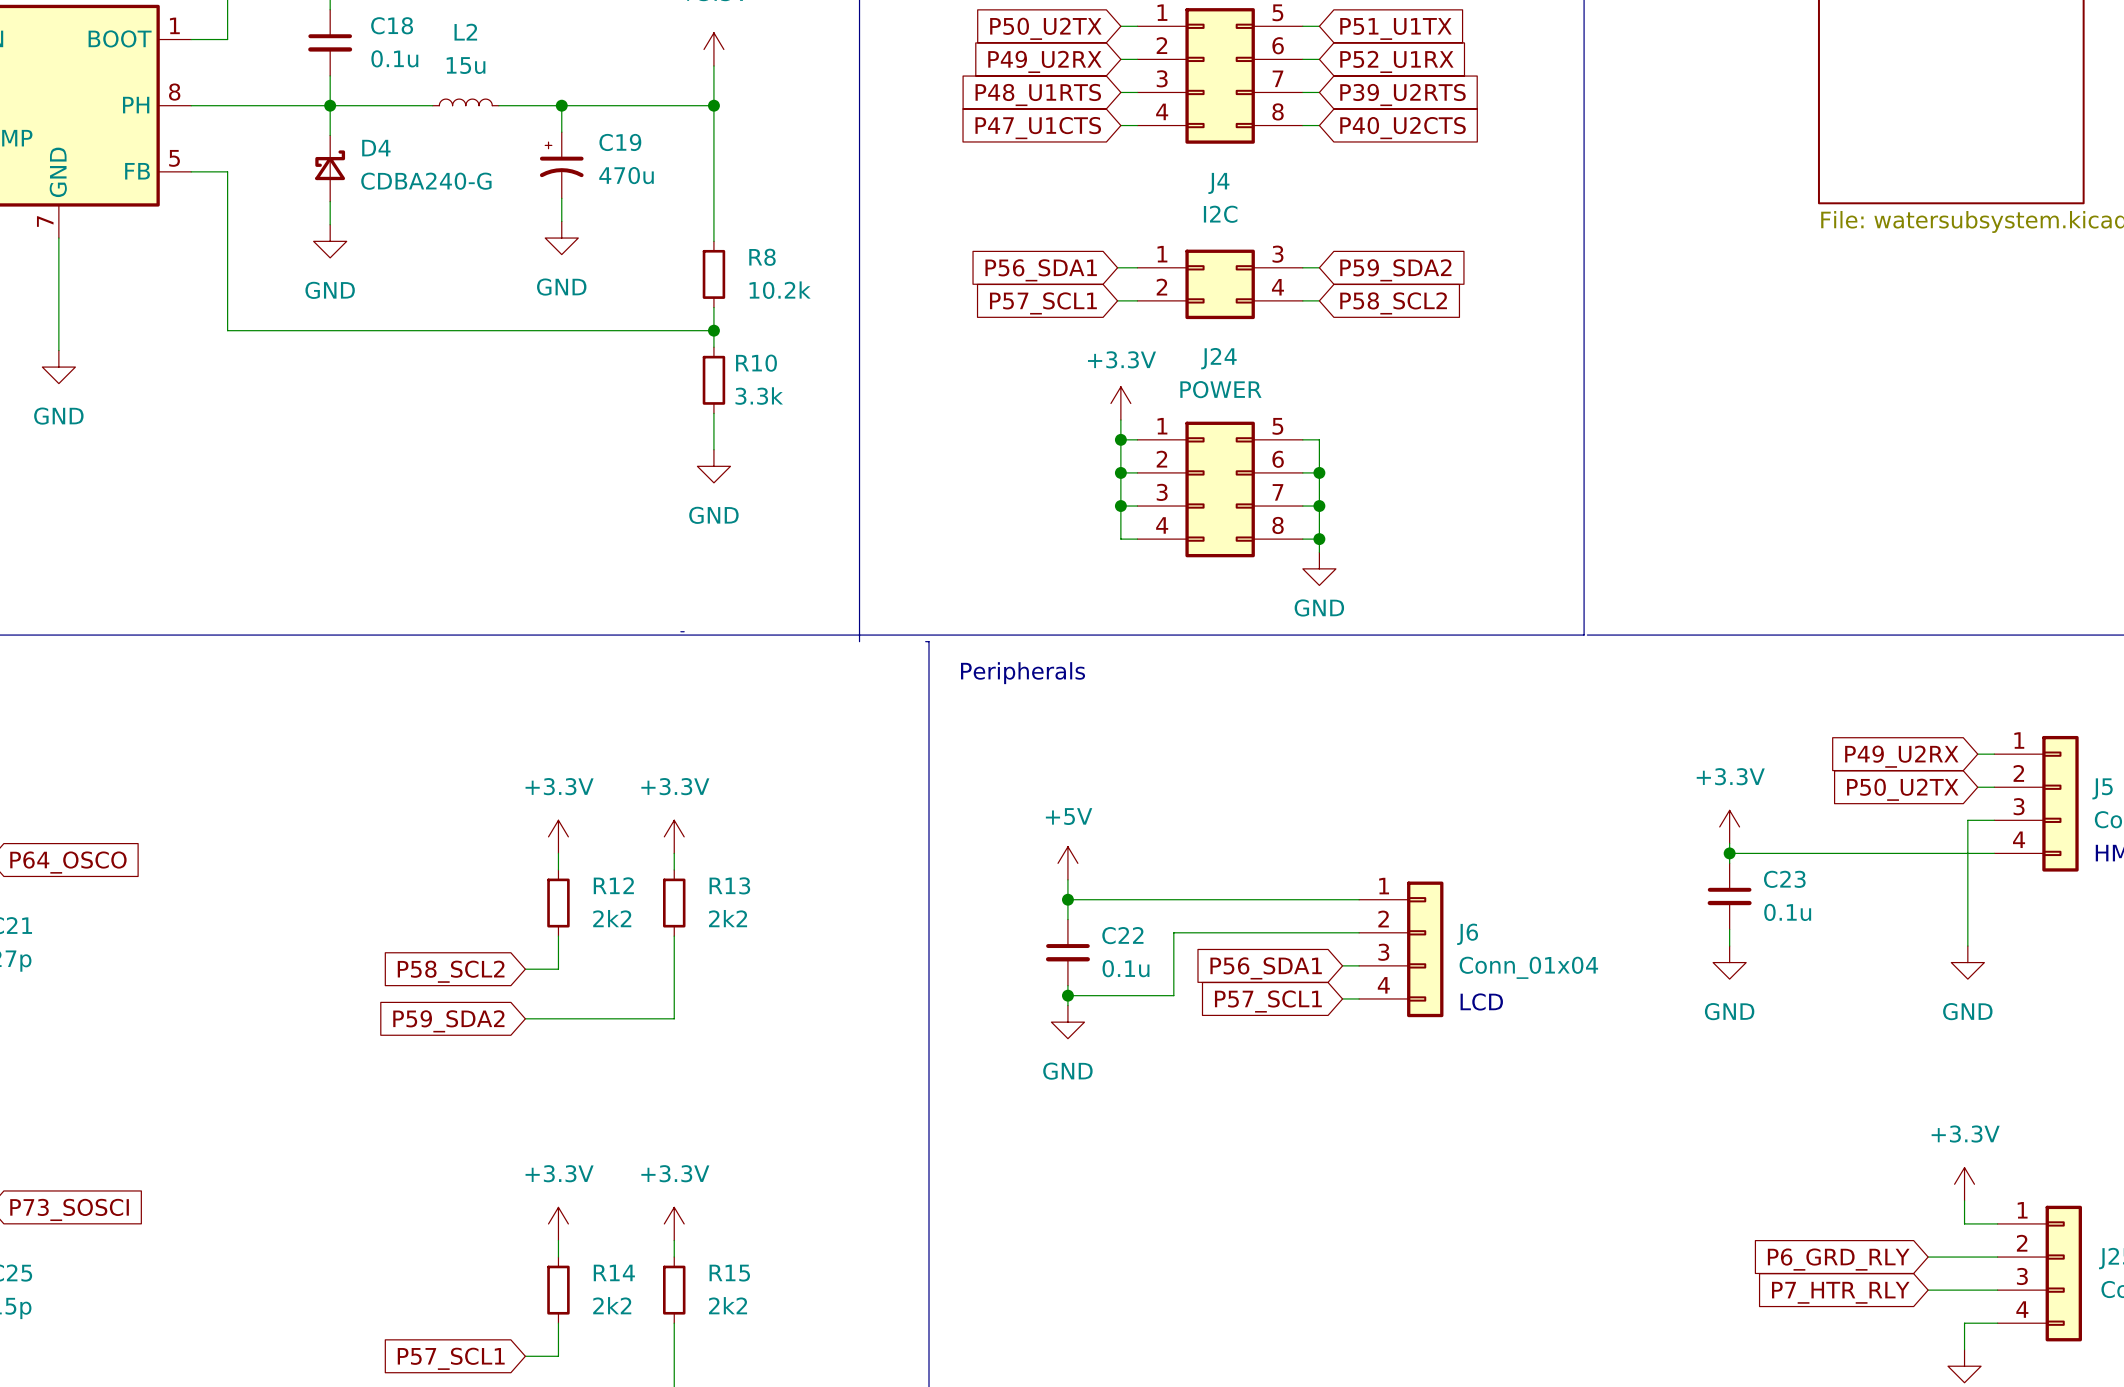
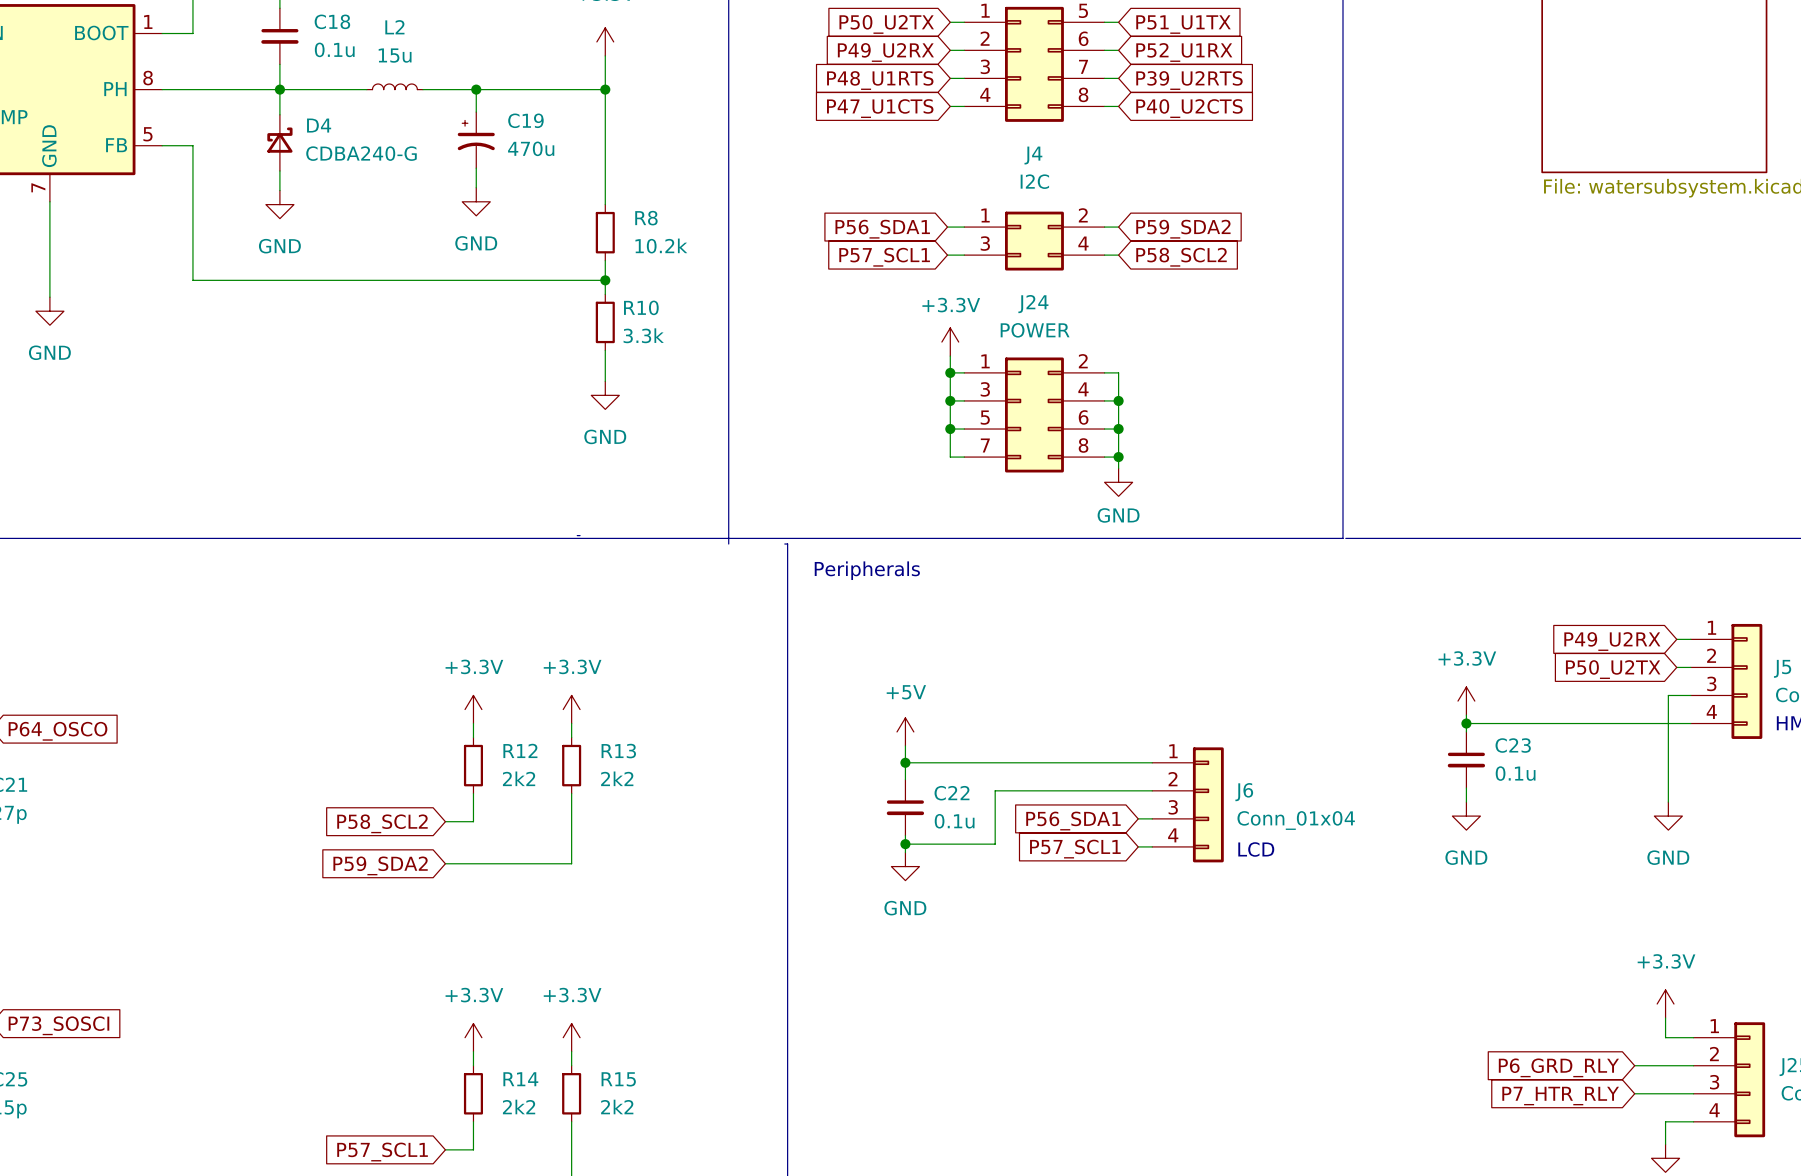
J4 pin number: 3 (1277, 254) -> 2 (1083, 215)
J4 pin number: 2 (1161, 287) -> 3 (985, 243)
J24 pin number: 5 (1277, 426) -> 2 (1083, 361)
J24 pin number: 2 (1161, 459) -> 3 (985, 389)
J24 pin number: 6 (1278, 459) -> 4 (1083, 389)
J24 pin number: 3 (1162, 492) -> 5 (985, 417)
J24 pin number: 7 (1278, 492) -> 6 (1083, 417)
J24 pin number: 4 (1162, 525) -> 7 (985, 445)

